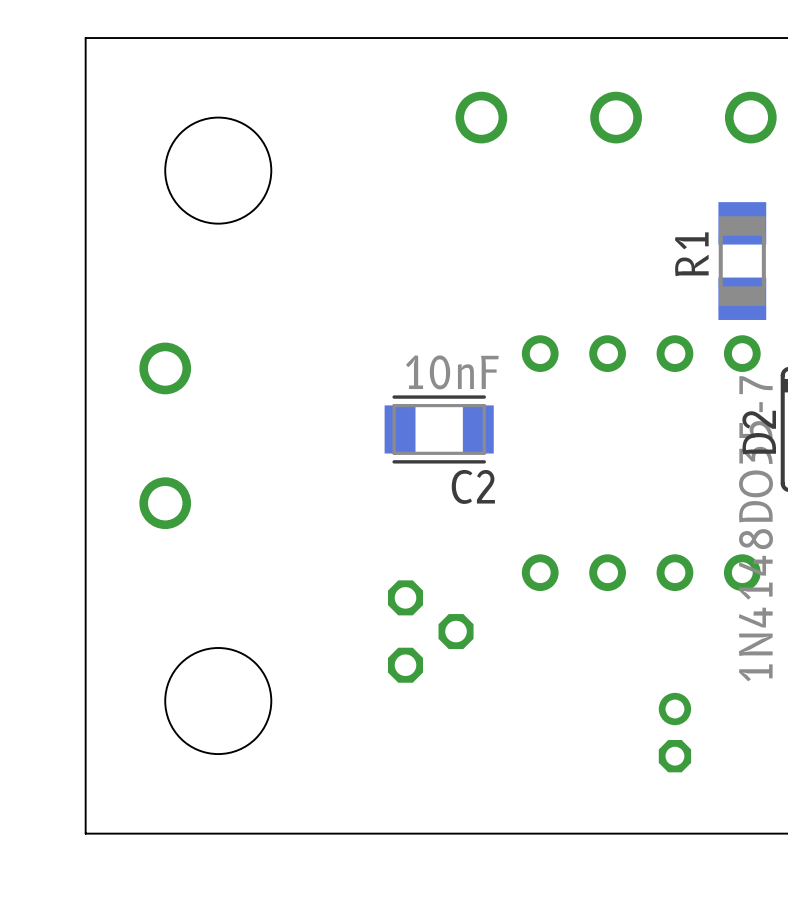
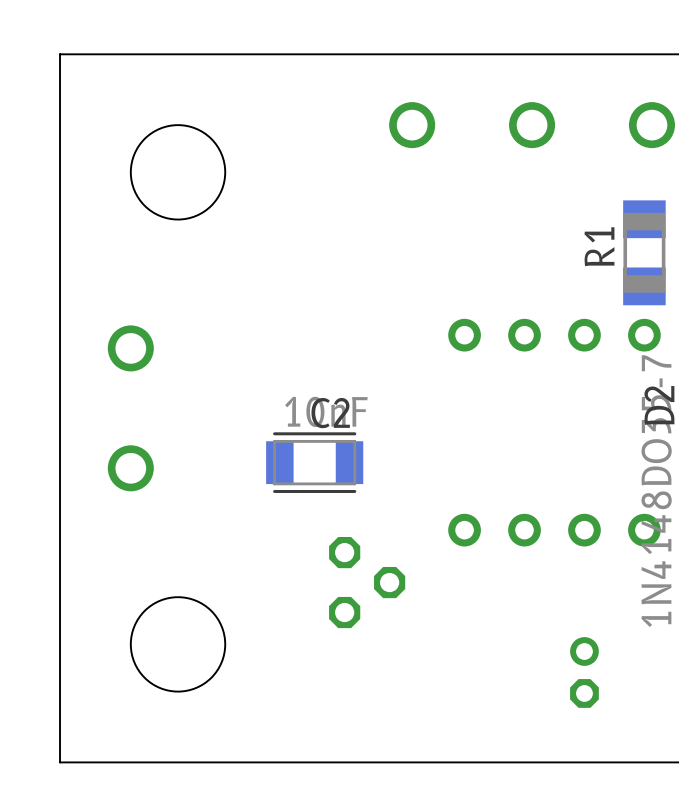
C2 position: (439, 429) -> (314, 462)
C2 name position: C2 (473, 486) -> C2 (330, 413)

